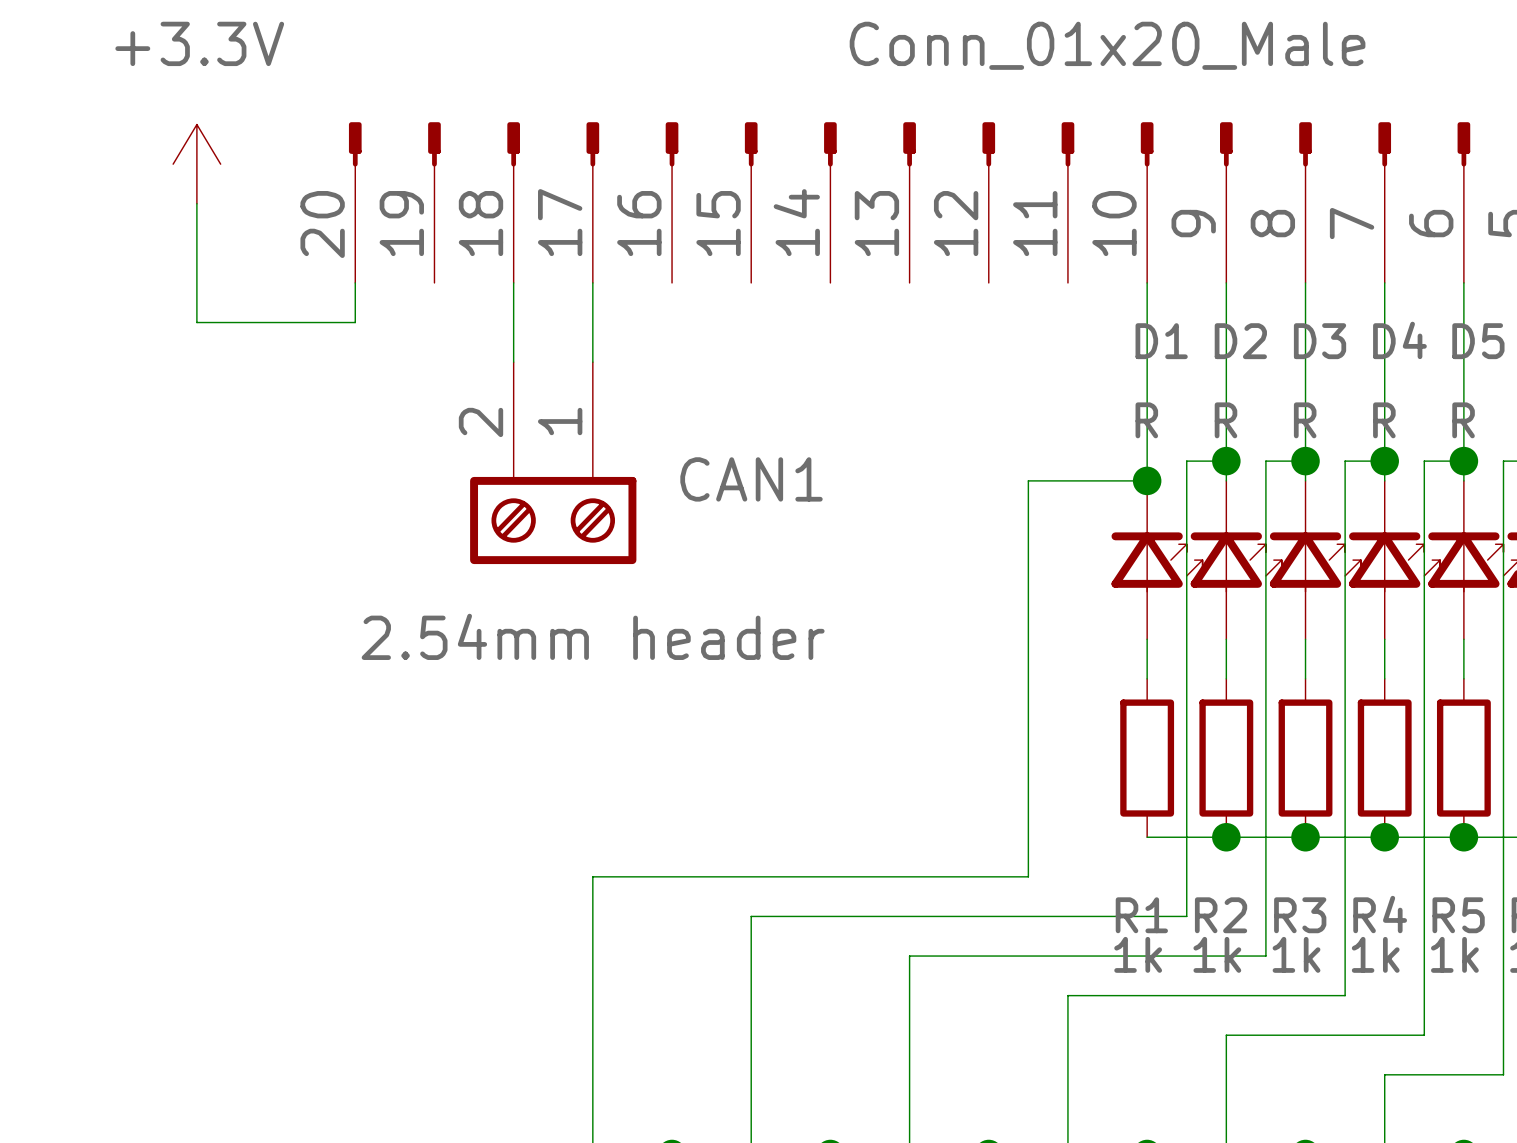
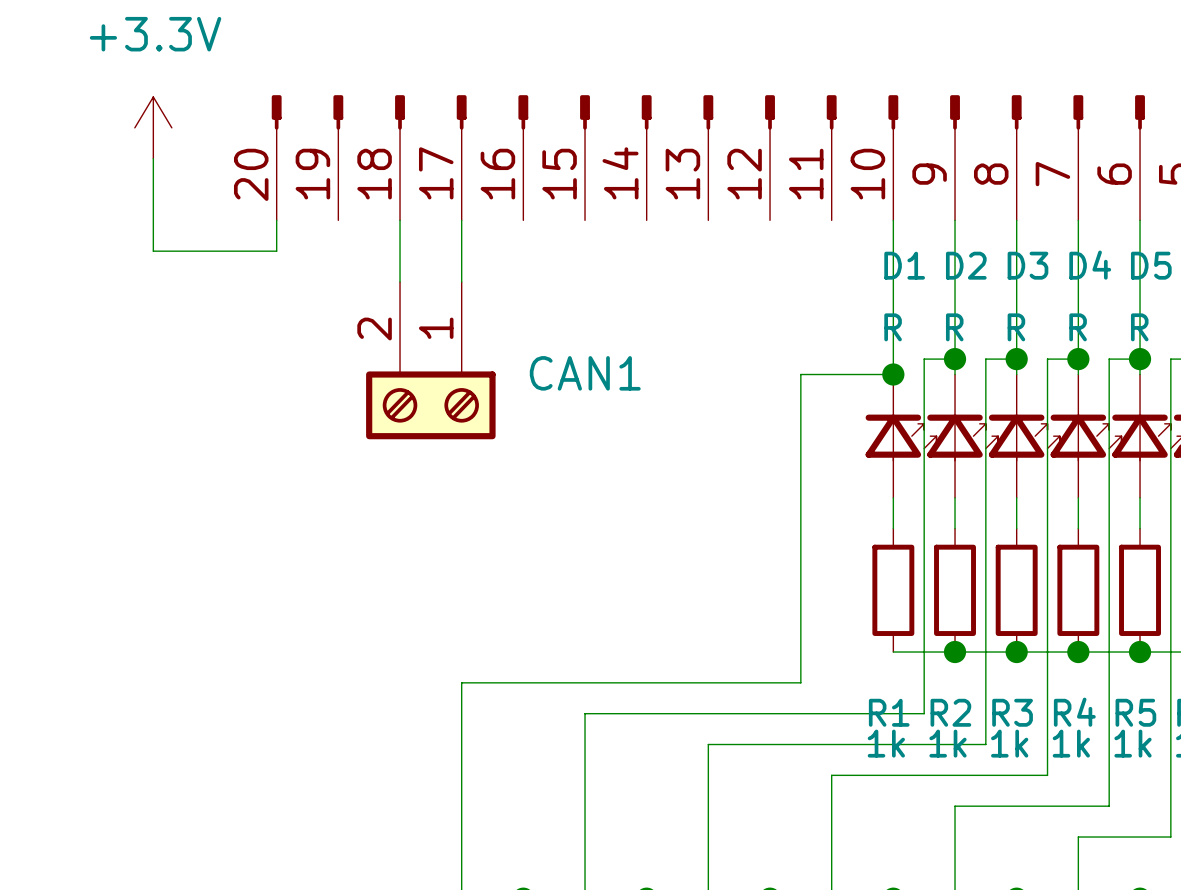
part value: Conn_01x20_Male (1107, 45) -> none
CAN1 value: 2.54mm header (593, 636) -> none

